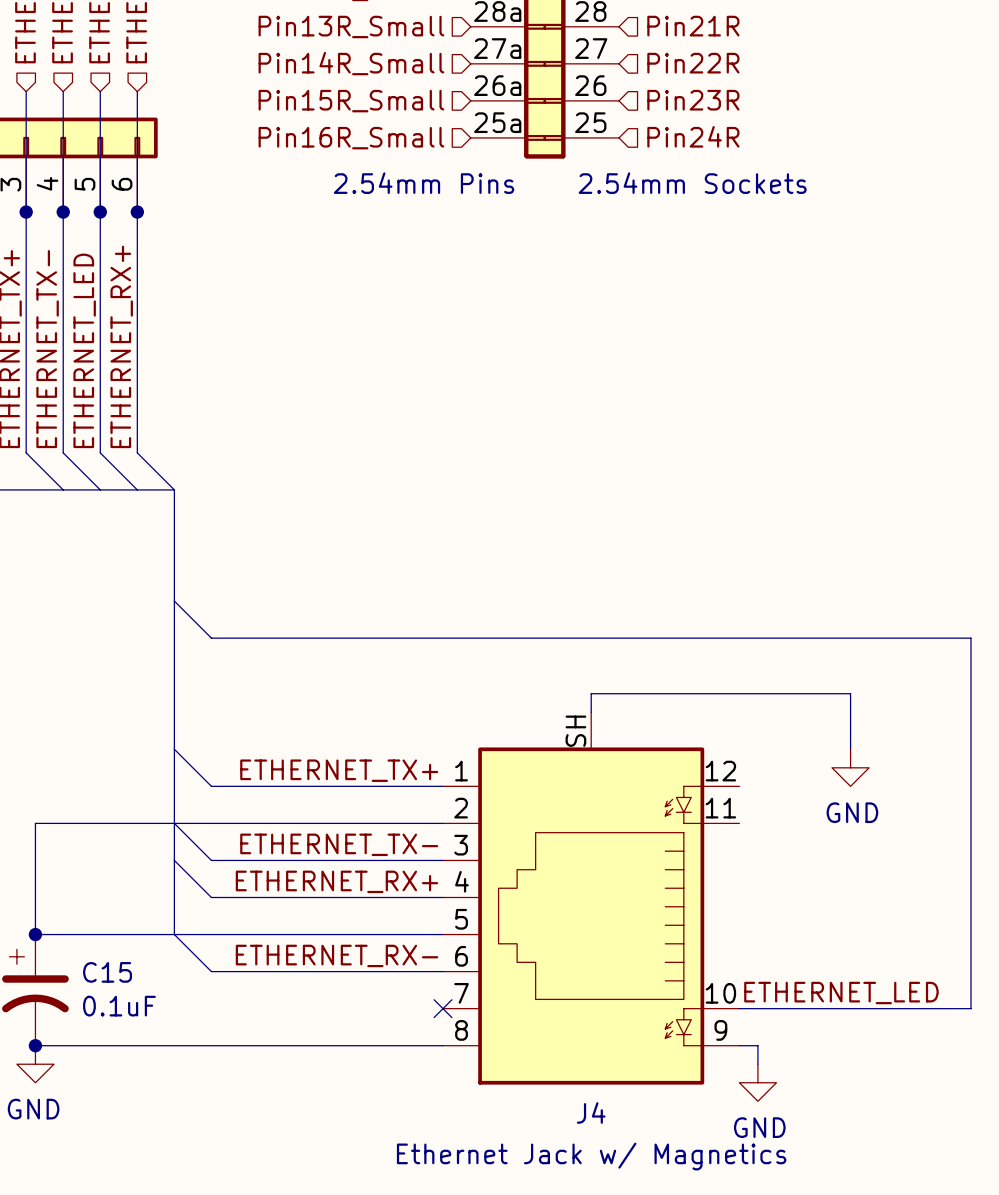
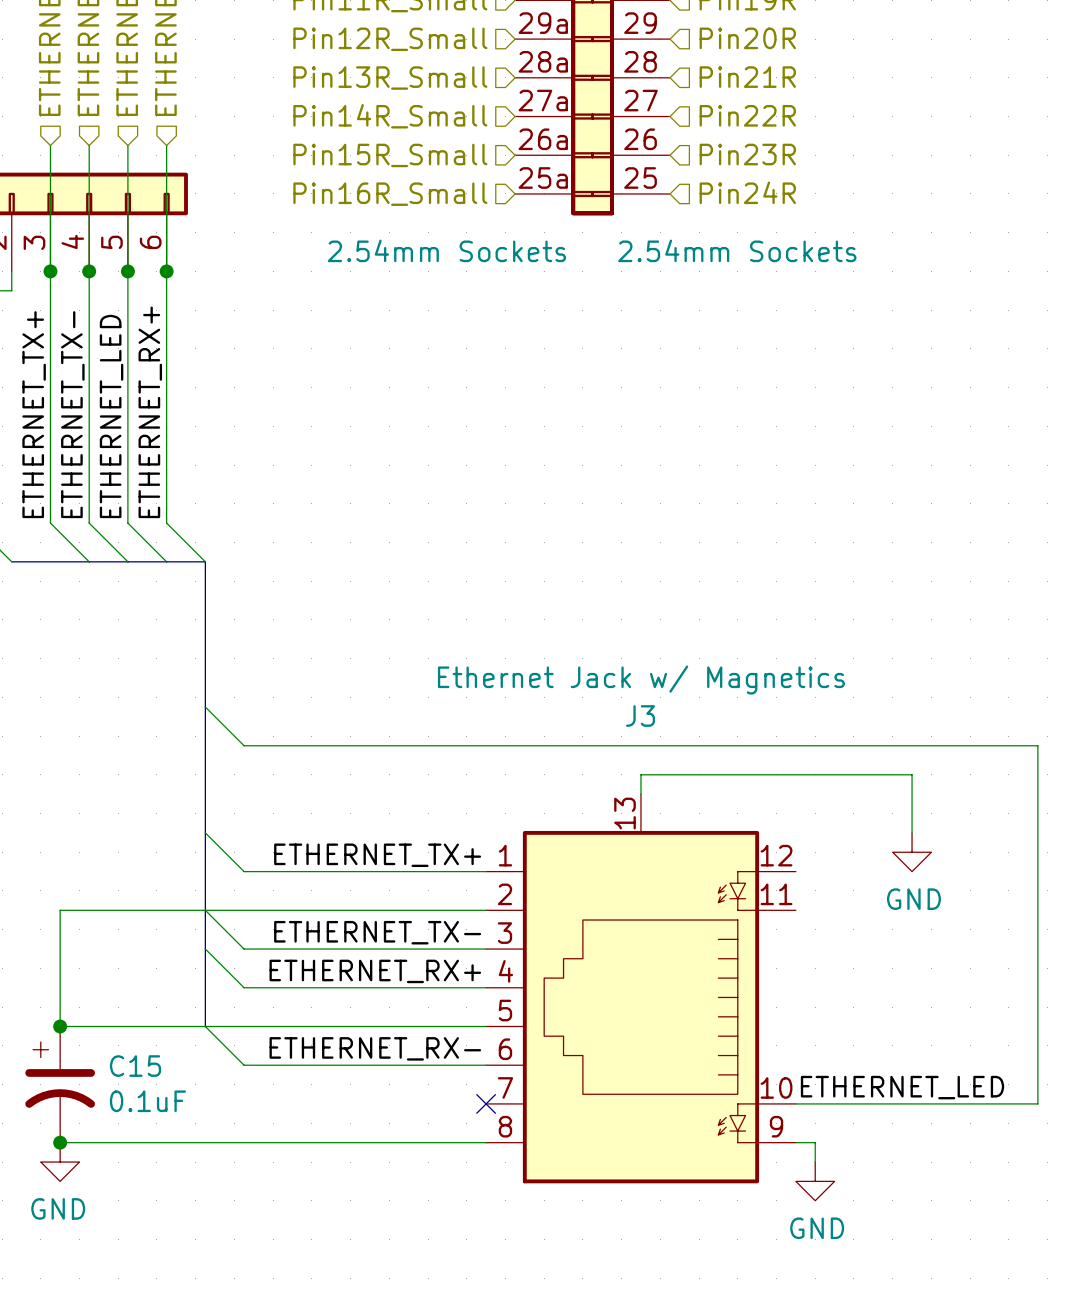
part text: 2.54mm Pins (424, 183) -> none
part text: 2.54mm Sockets (692, 183) -> none
part text: none -> 2.54mm Sockets (446, 250)
part text: none -> 2.54mm Sockets (737, 250)
wire: (174, 601) (211, 638) (970, 638) (970, 665) -> (244, 745) (1037, 745)
wire: none -> (205, 707) (244, 745)
J4 pin number: SH (575, 731) -> 13 (625, 813)
J4 name: J4 (591, 1112) -> J3 (640, 716)
J4 value position: Ethernet Jack w/ Magnetics (591, 1156) -> Ethernet Jack w/ Magnetics (641, 680)

